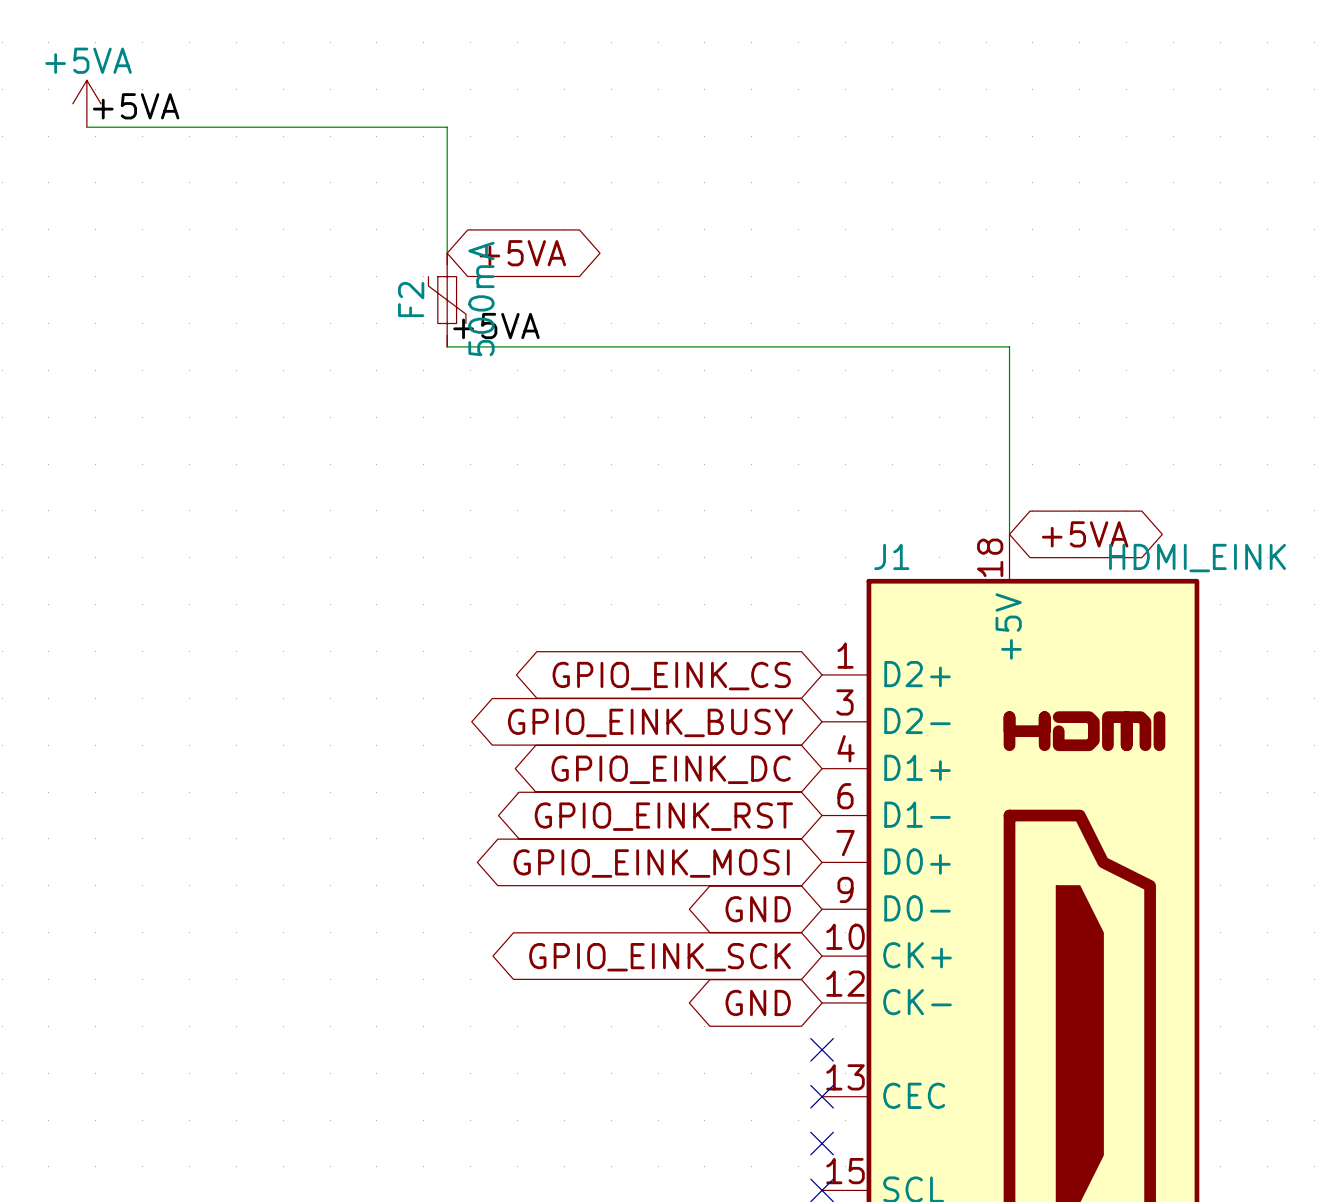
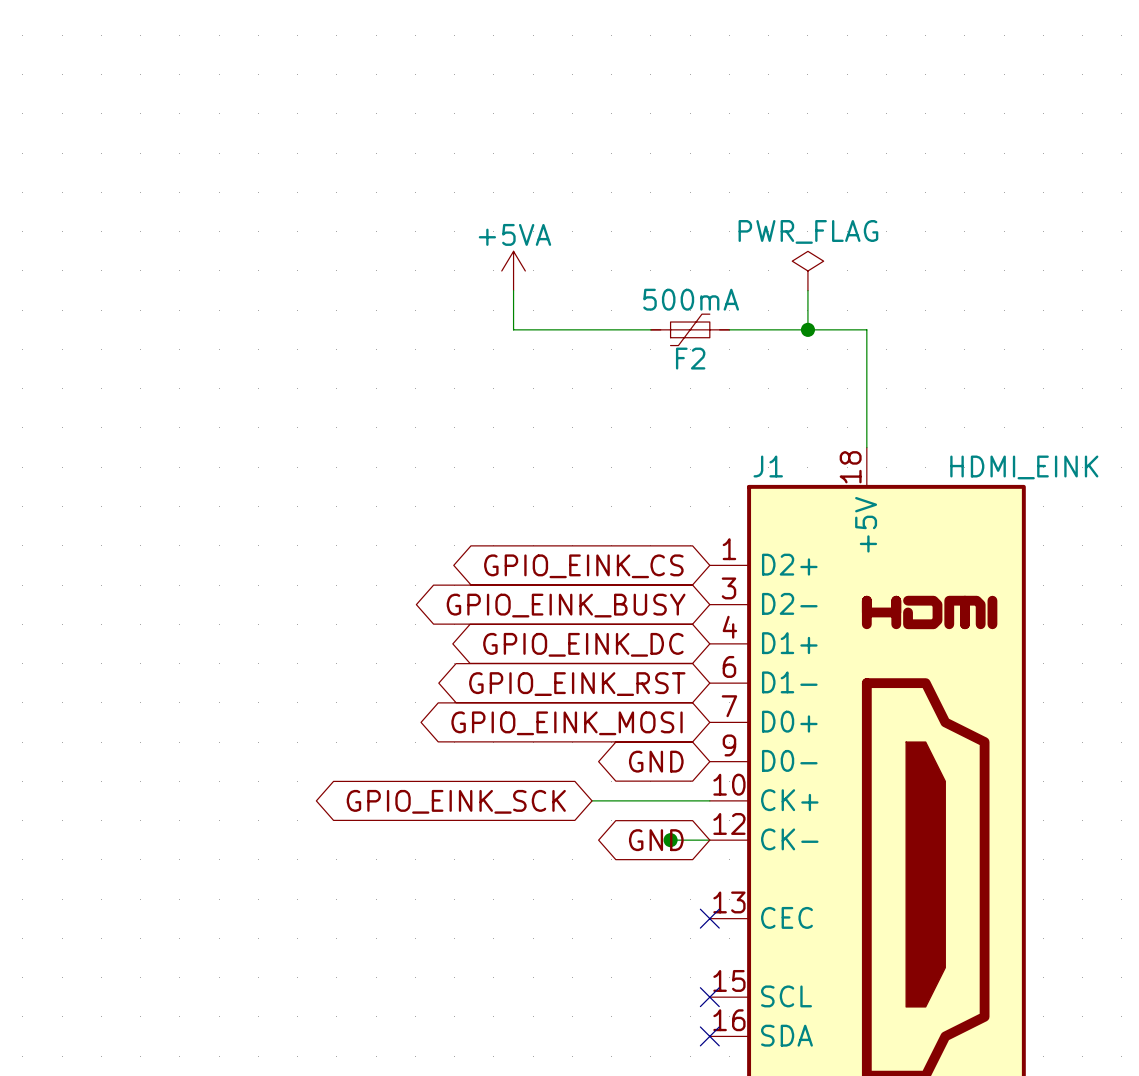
power symbol: +5VA (86, 103) -> none
label: +5VA (136, 106) -> none
wire: (86, 127) (447, 127) (447, 253) -> none
global label: +5VA (522, 253) -> none
F2 value position: 500mA (481, 298) -> 500mA (691, 299)
F2 name position: F2 (411, 299) -> F2 (690, 358)
F2 rotation: 0° (447, 300) -> 90° clockwise (690, 329)
F2 position: (447, 300) -> (690, 329)
power symbol: none -> +5VA (513, 270)
power symbol: none -> PWR_FLAG (807, 270)
label: +5VA (496, 326) -> none
wire: (447, 346) (1009, 346) (1009, 393) -> (729, 329) (866, 329)
wire: none -> (513, 290) (513, 329) (650, 329)
wire: none -> (807, 290) (807, 329)
junction: none -> (807, 329)
global label: +5VA (1085, 534) -> none
wire: none -> (592, 800) (709, 800)
global label position: GPIO_EINK_SCK (659, 957) -> GPIO_EINK_SCK (456, 801)
wire: none -> (670, 840) (709, 840)
junction: none -> (670, 840)
no-connect mark: (822, 1049) -> none
no-connect mark: (822, 1143) -> none

